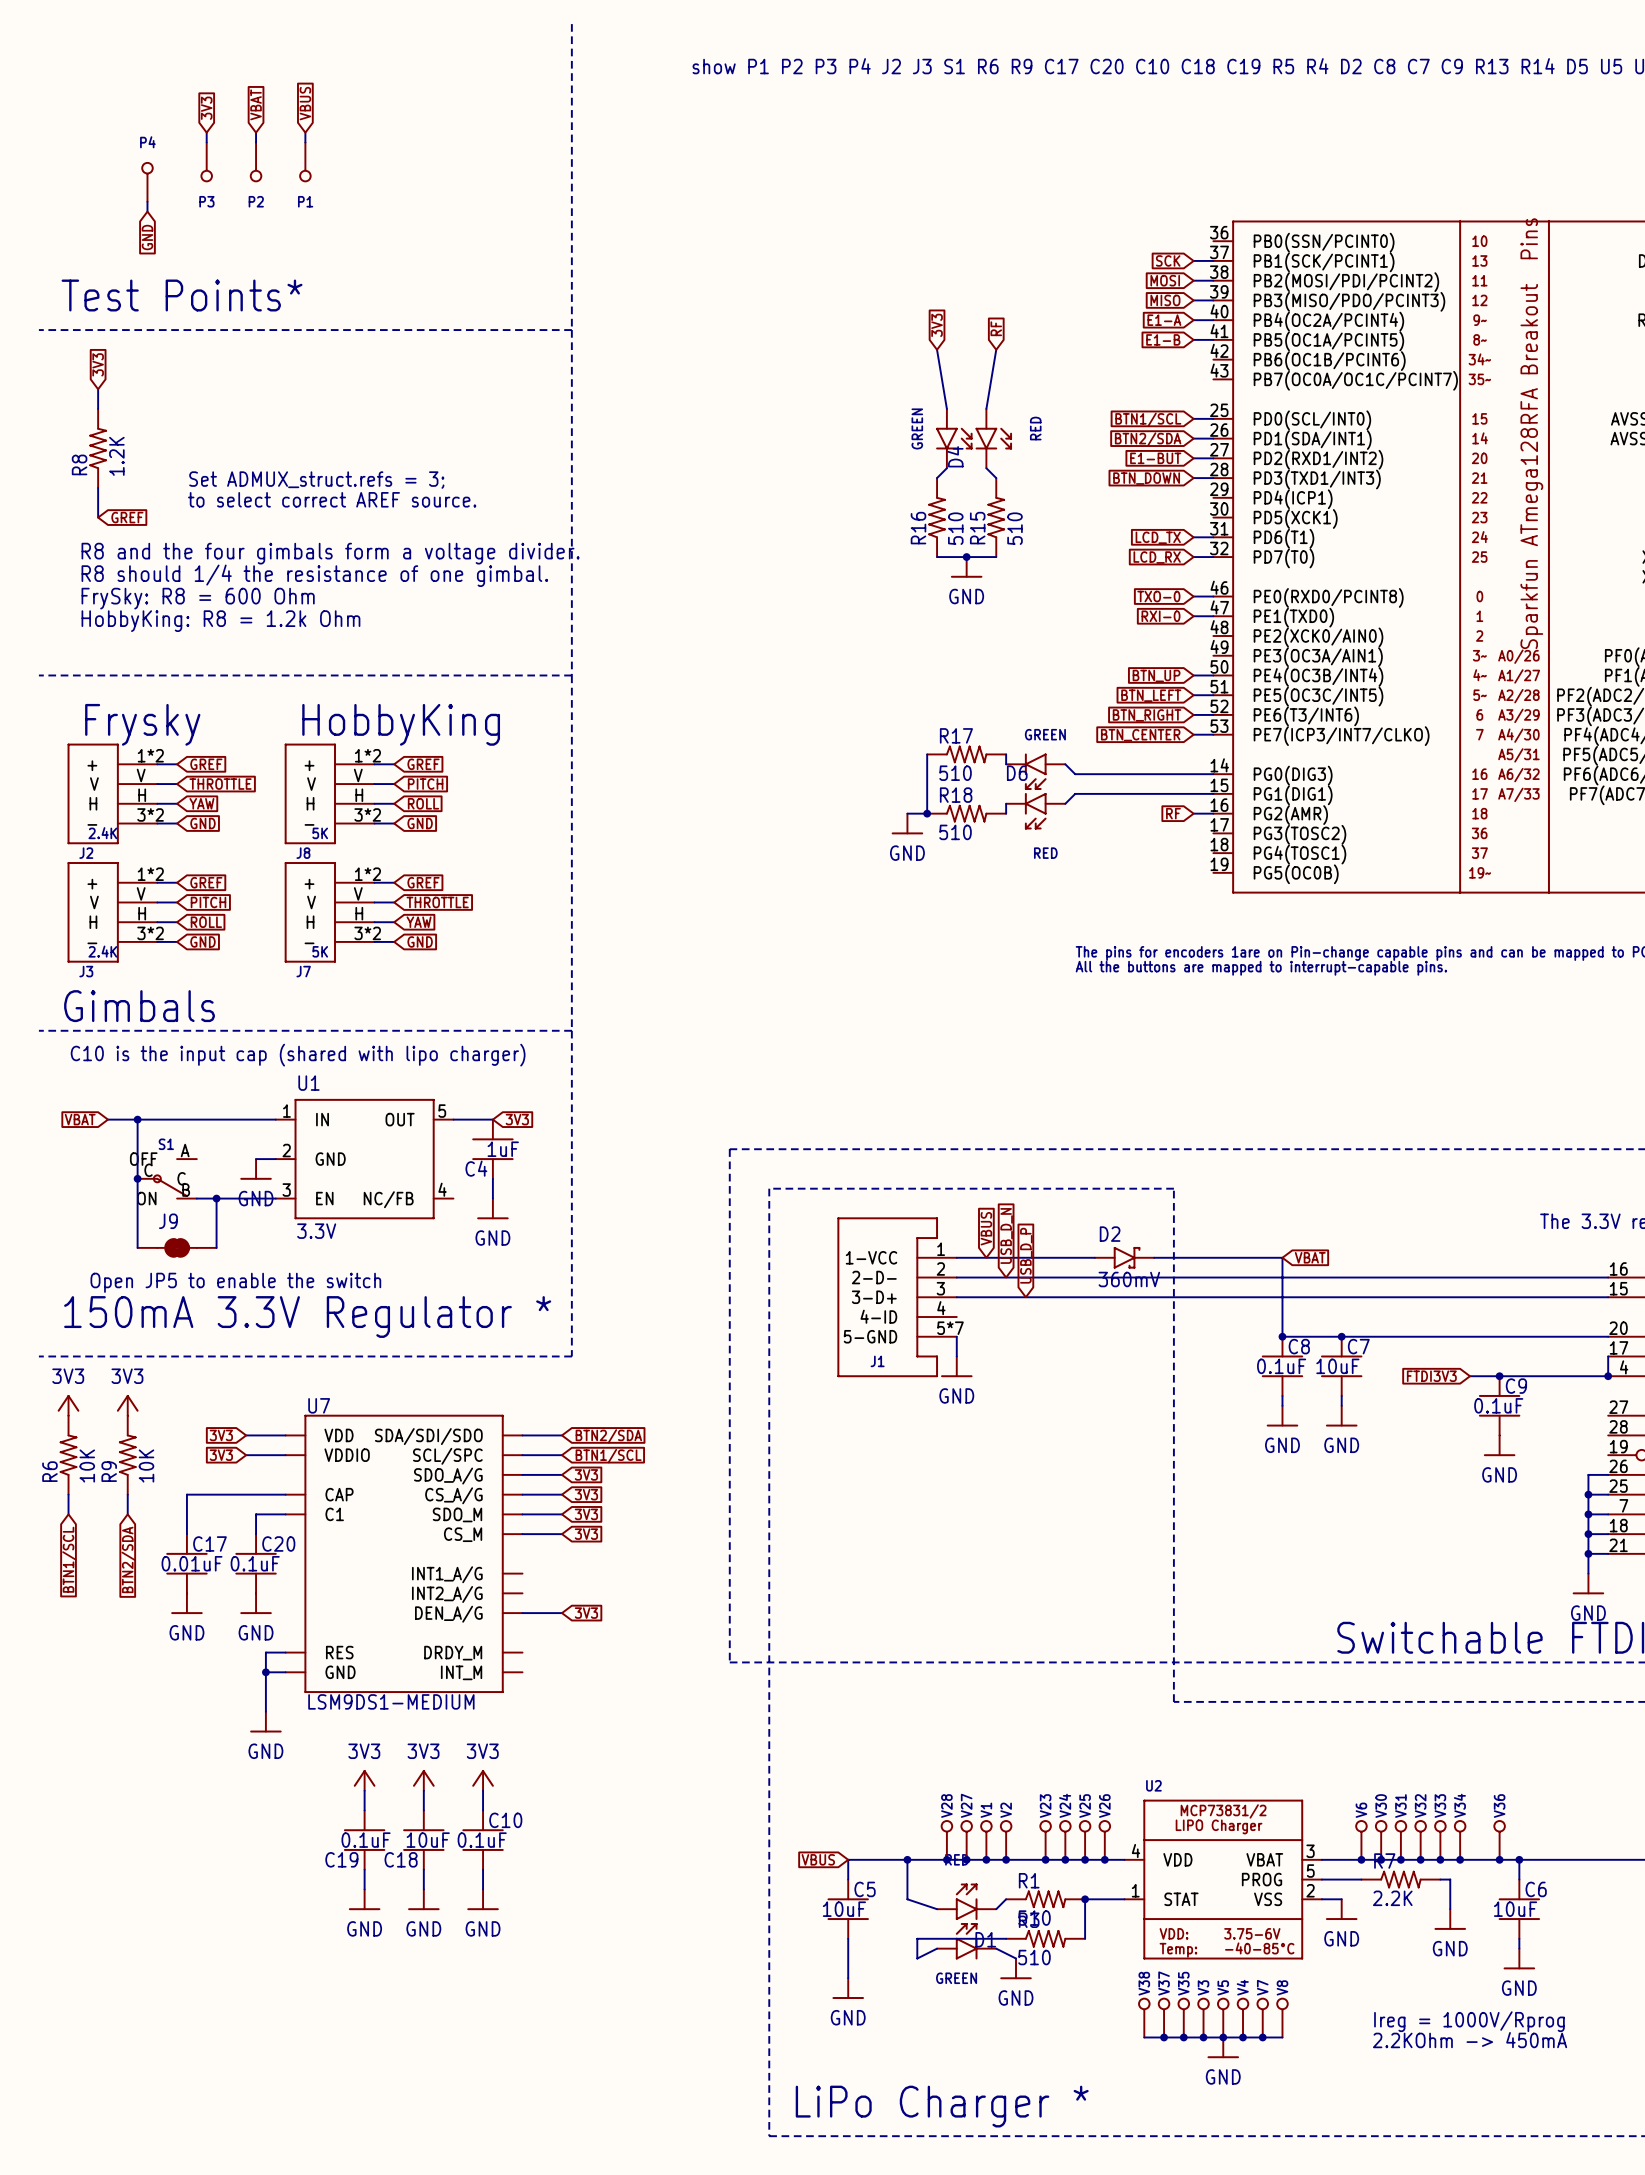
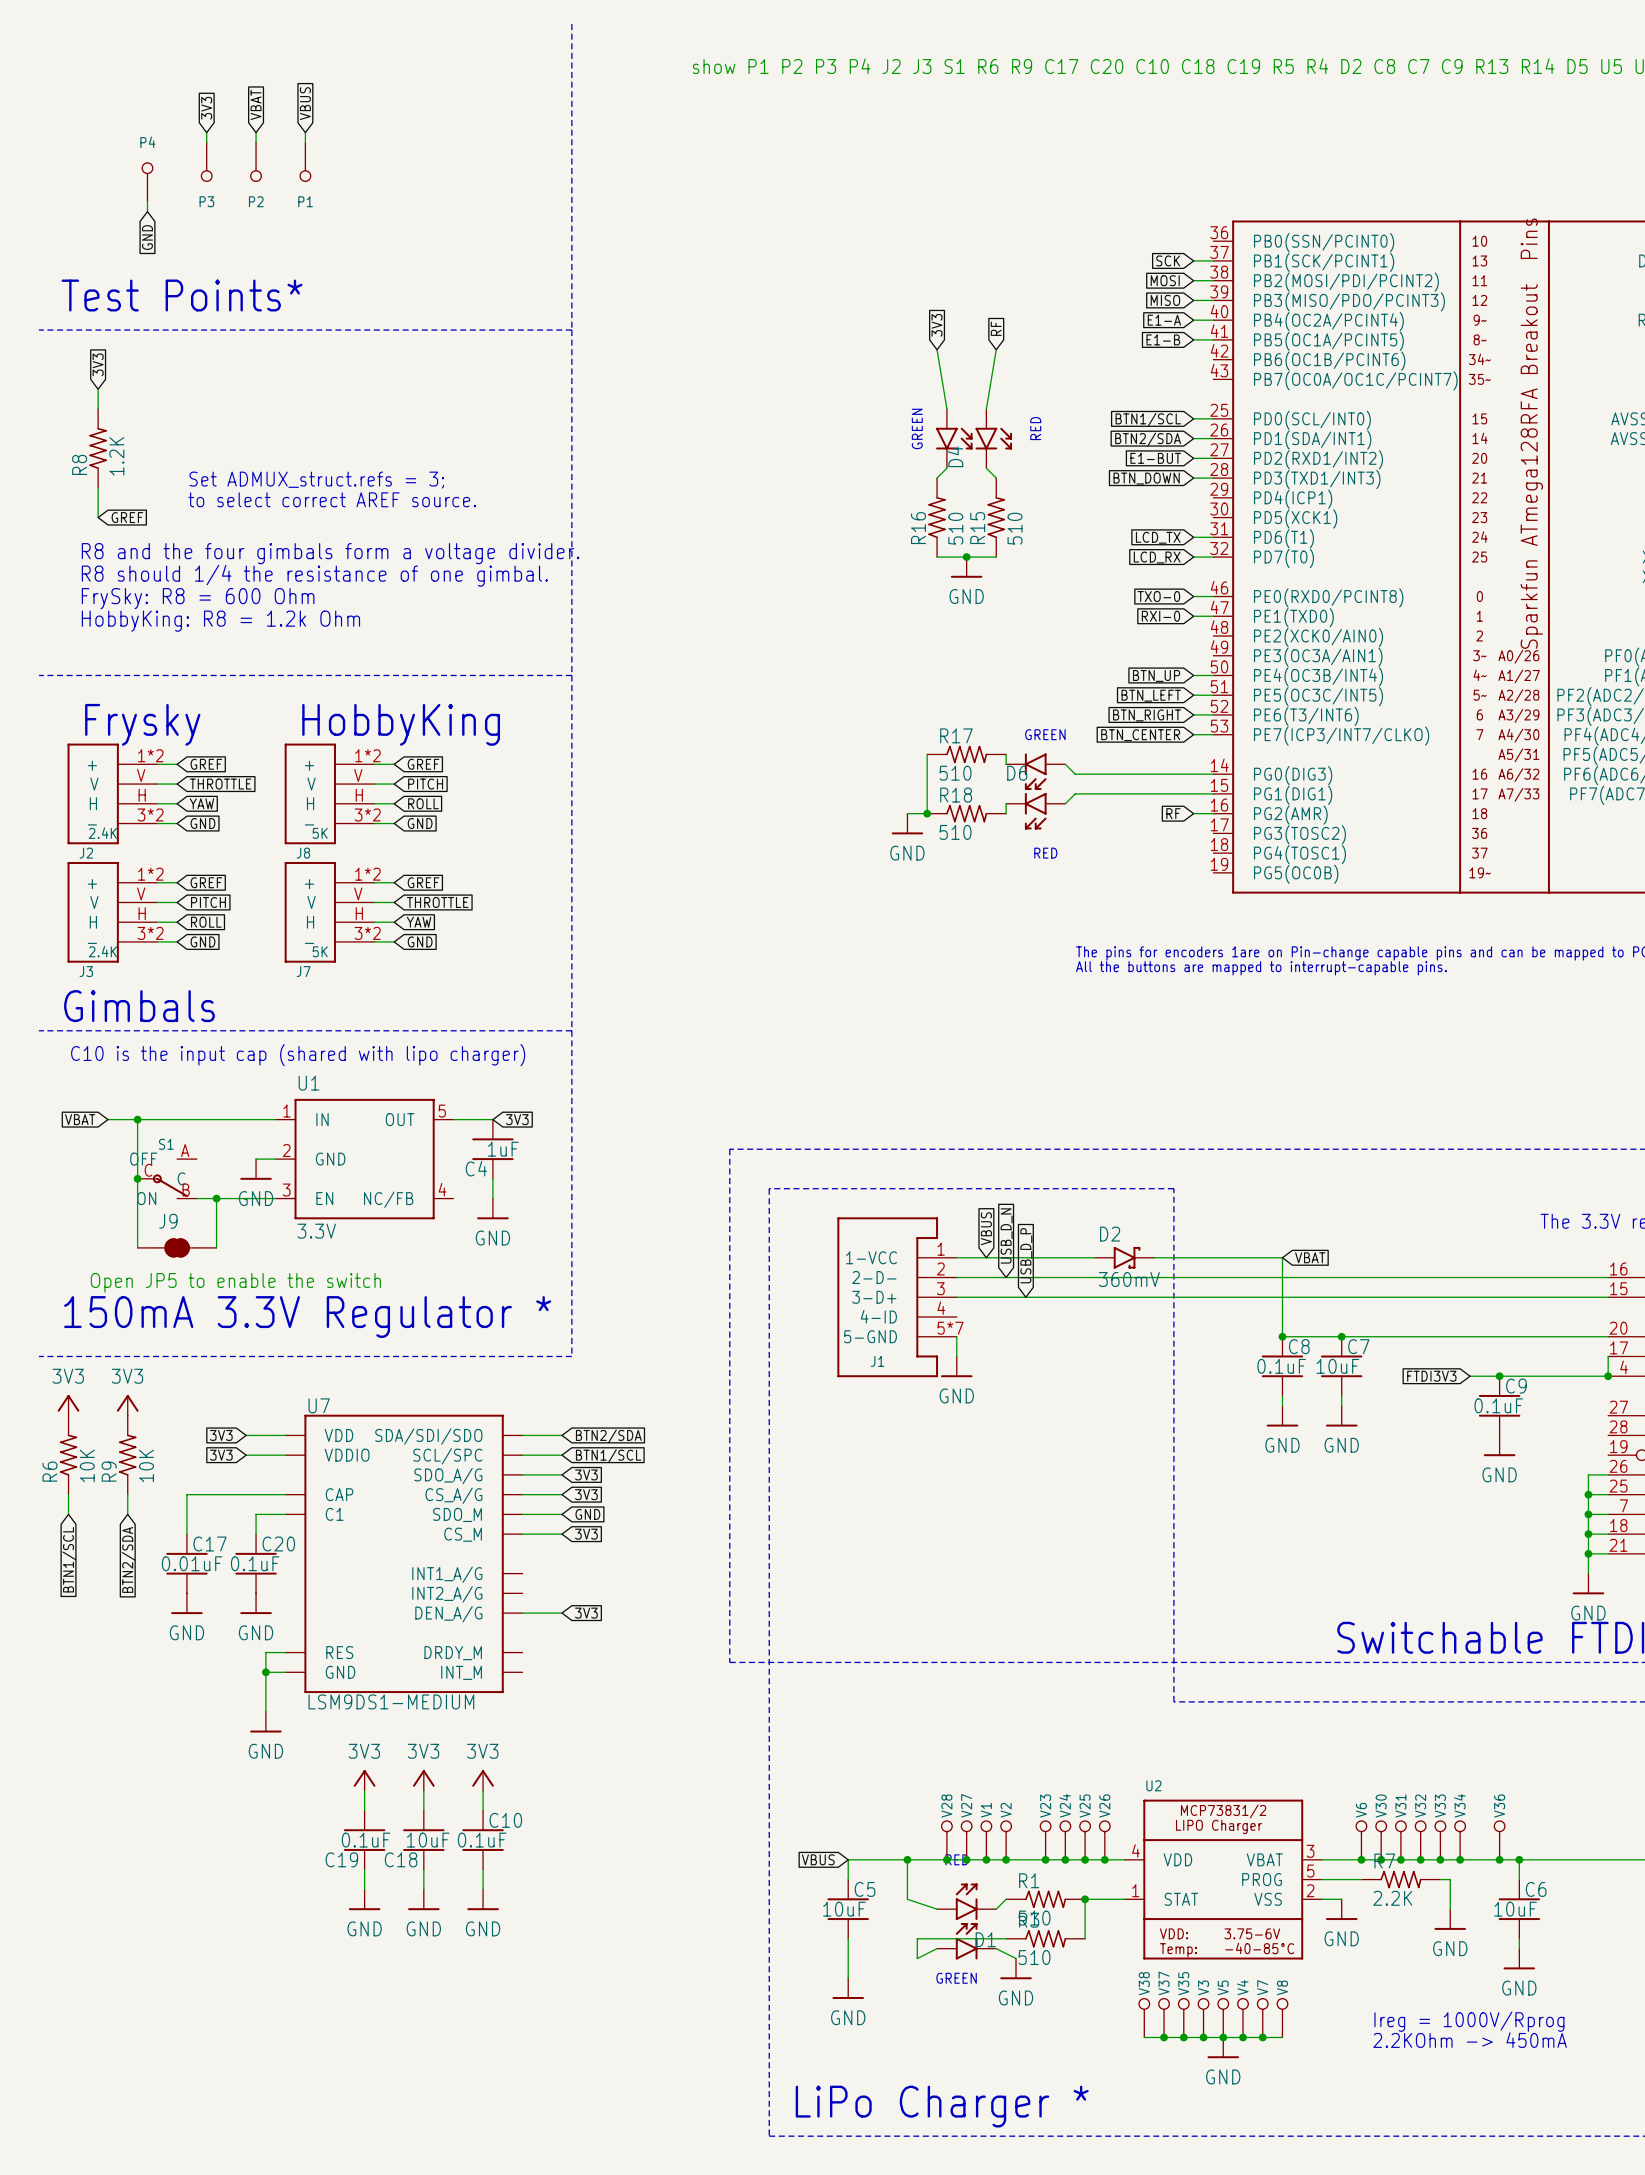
global label: 3V3 (586, 1514) -> GND (587, 1514)

